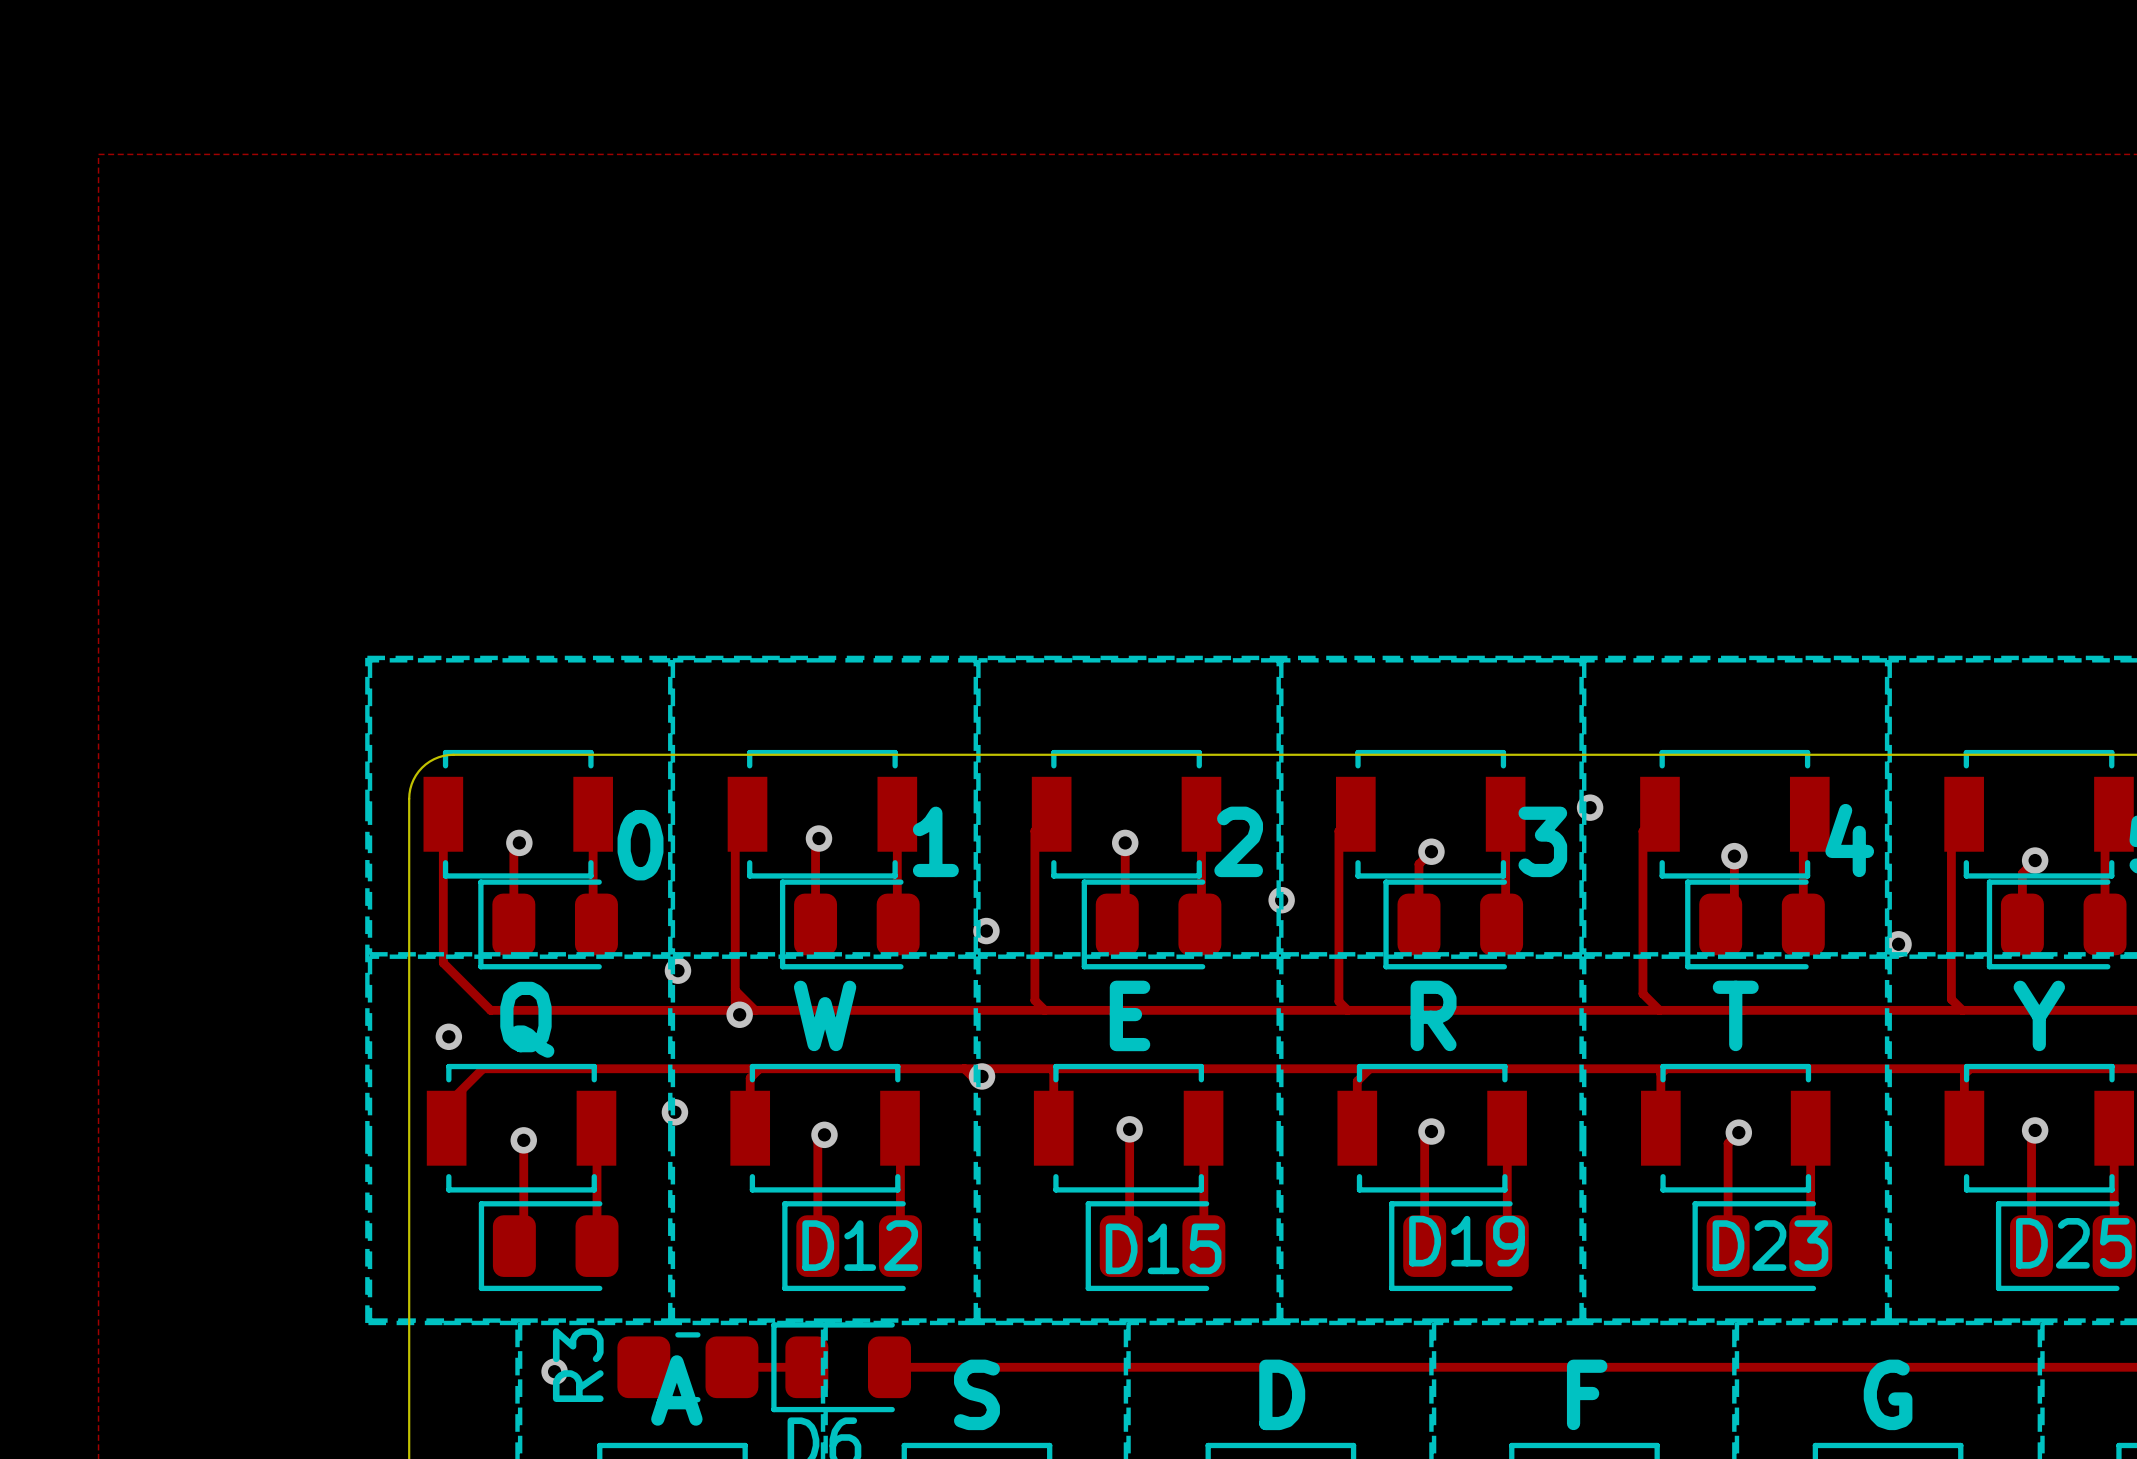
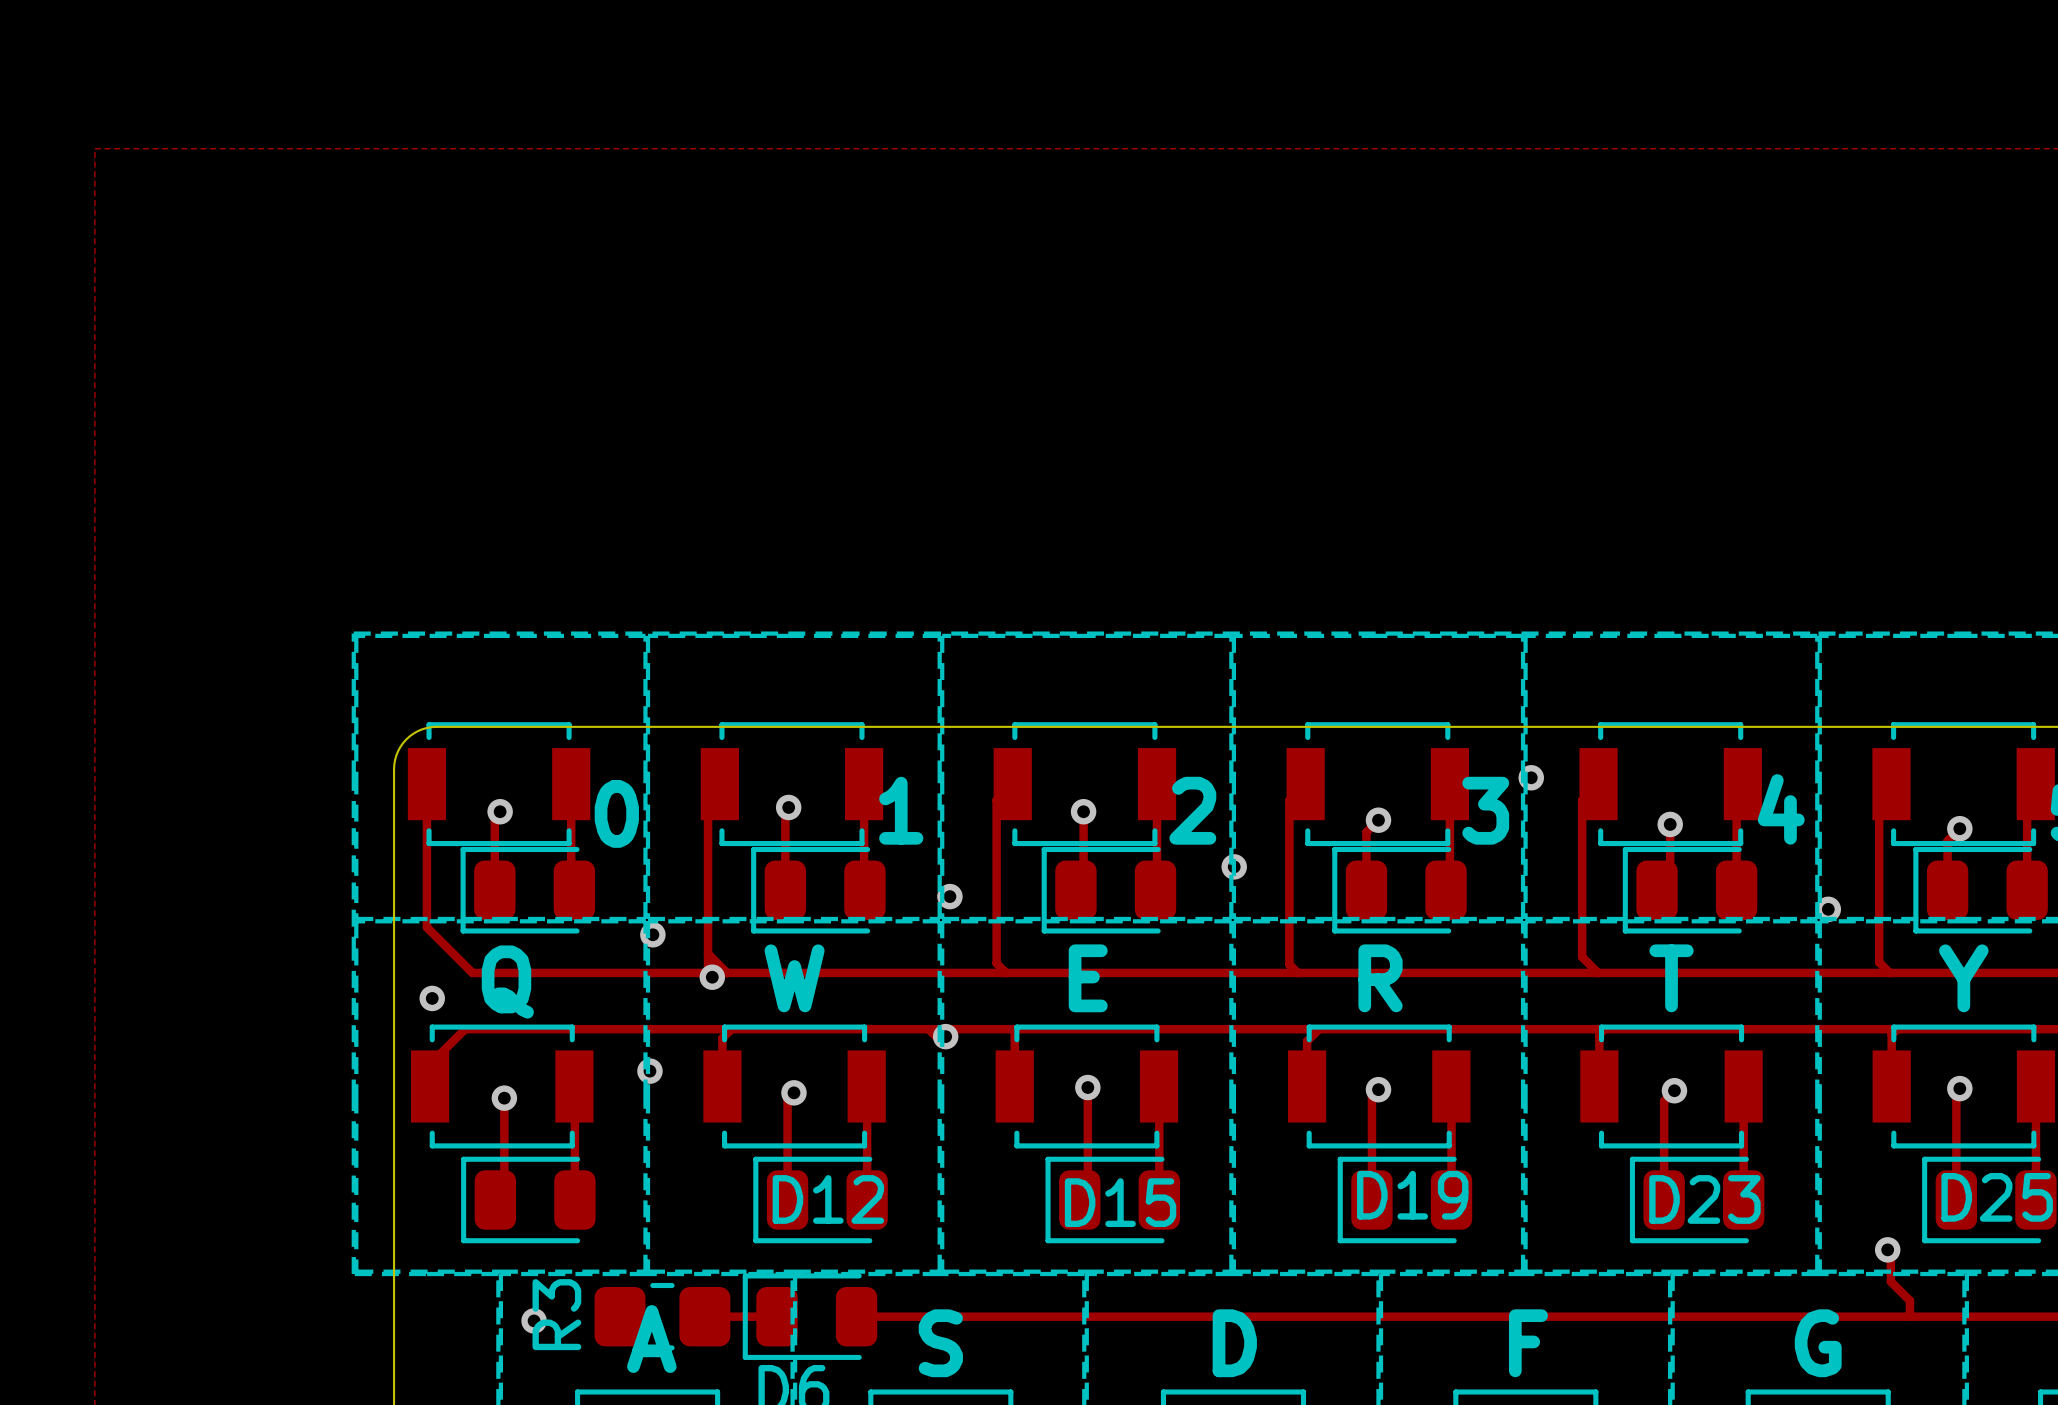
track: none -> (1887, 1249) (1890, 1253) (1890, 1281) (1909, 1300) (1909, 1316)
via: none -> (1887, 1249)

